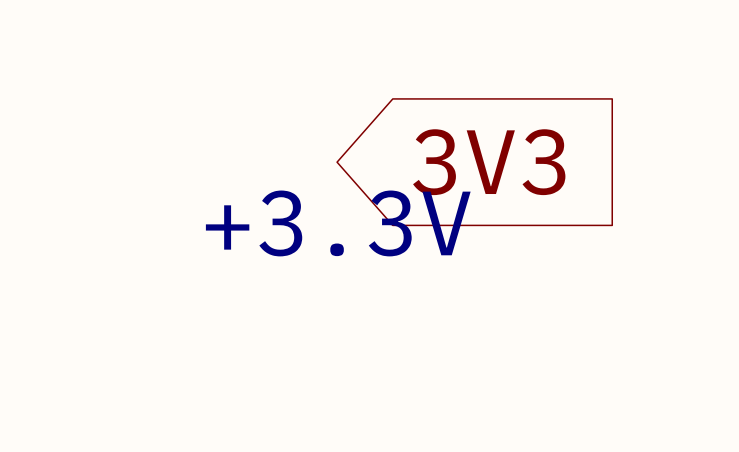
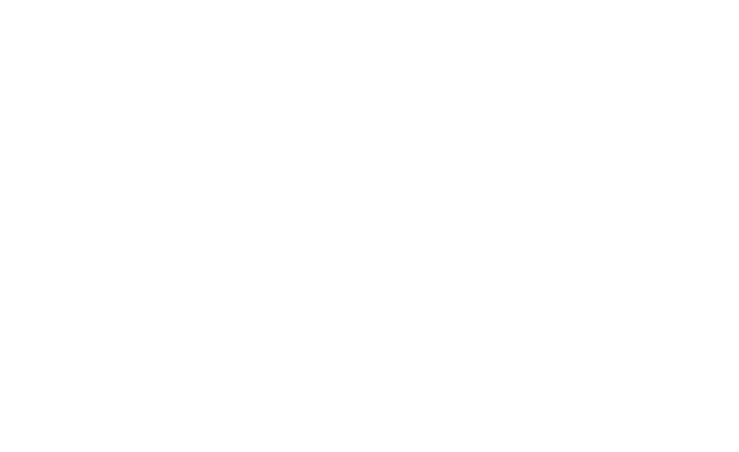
global label: 3V3 (489, 162) -> none
power symbol: +3.3V (338, 223) -> none

